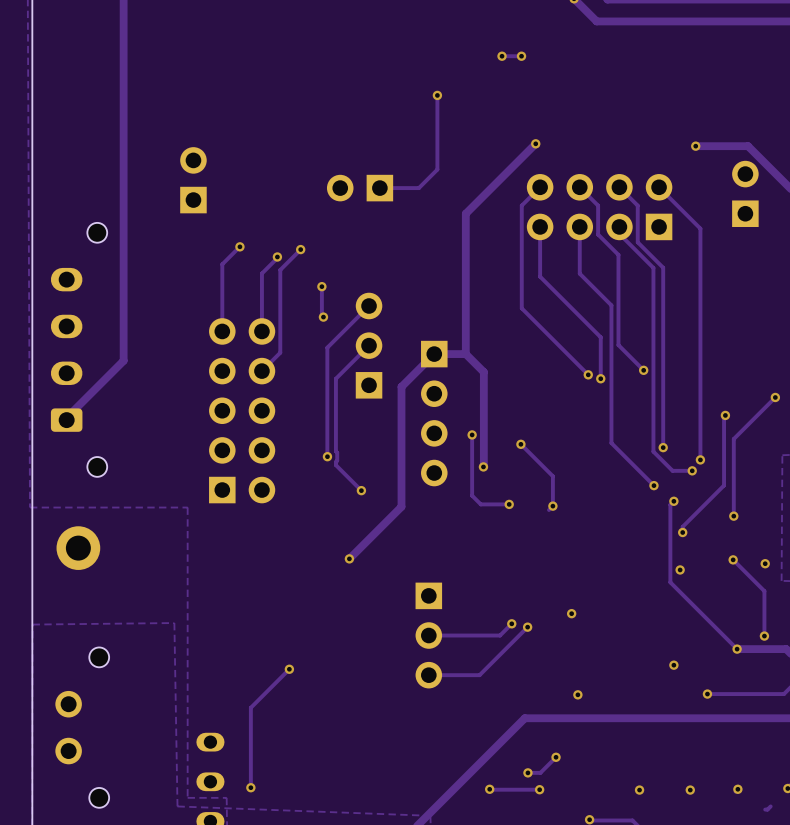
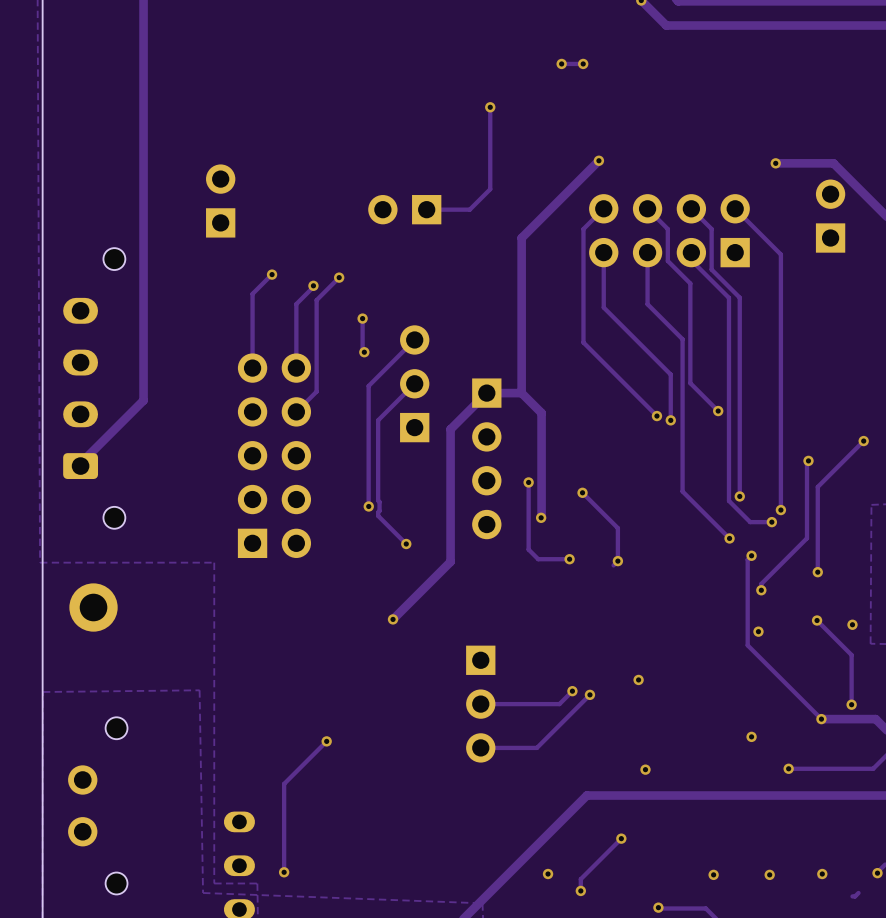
via: (527, 772) -> none
track: (540, 772) (527, 772) -> (604, 855) (580, 879) (580, 890)
track: (489, 789) (539, 789) -> none
via: (539, 789) -> none
via: none -> (580, 890)

